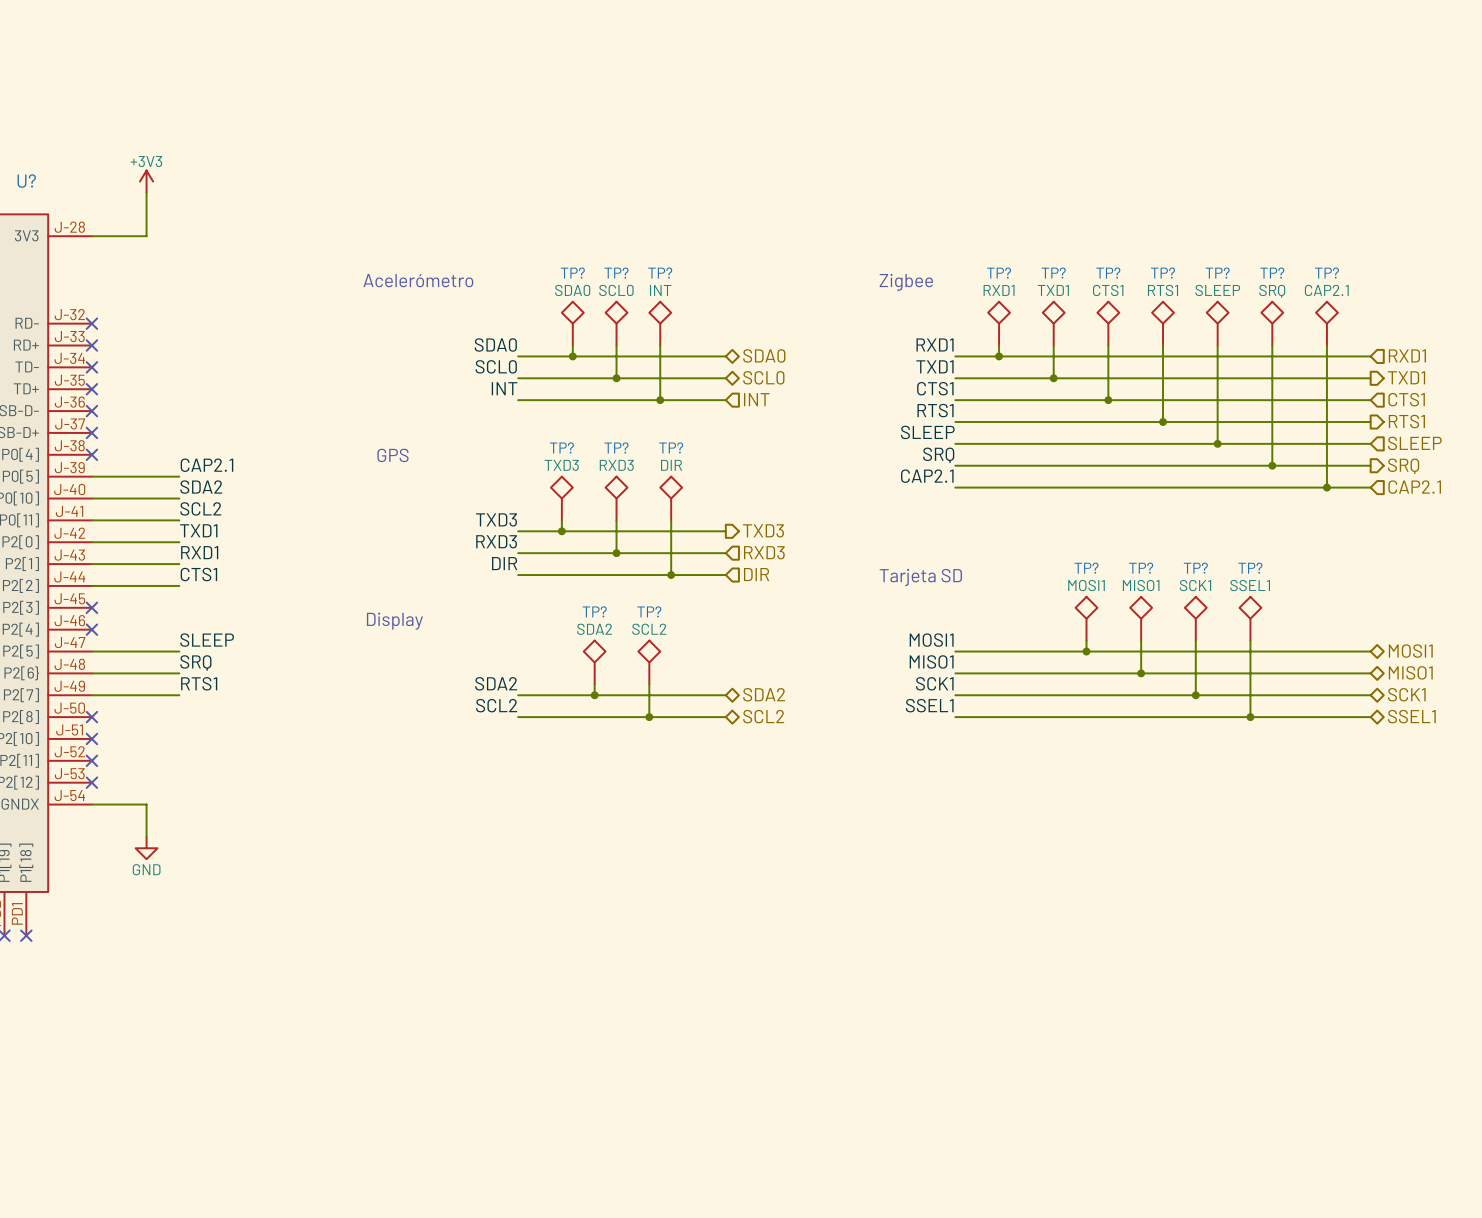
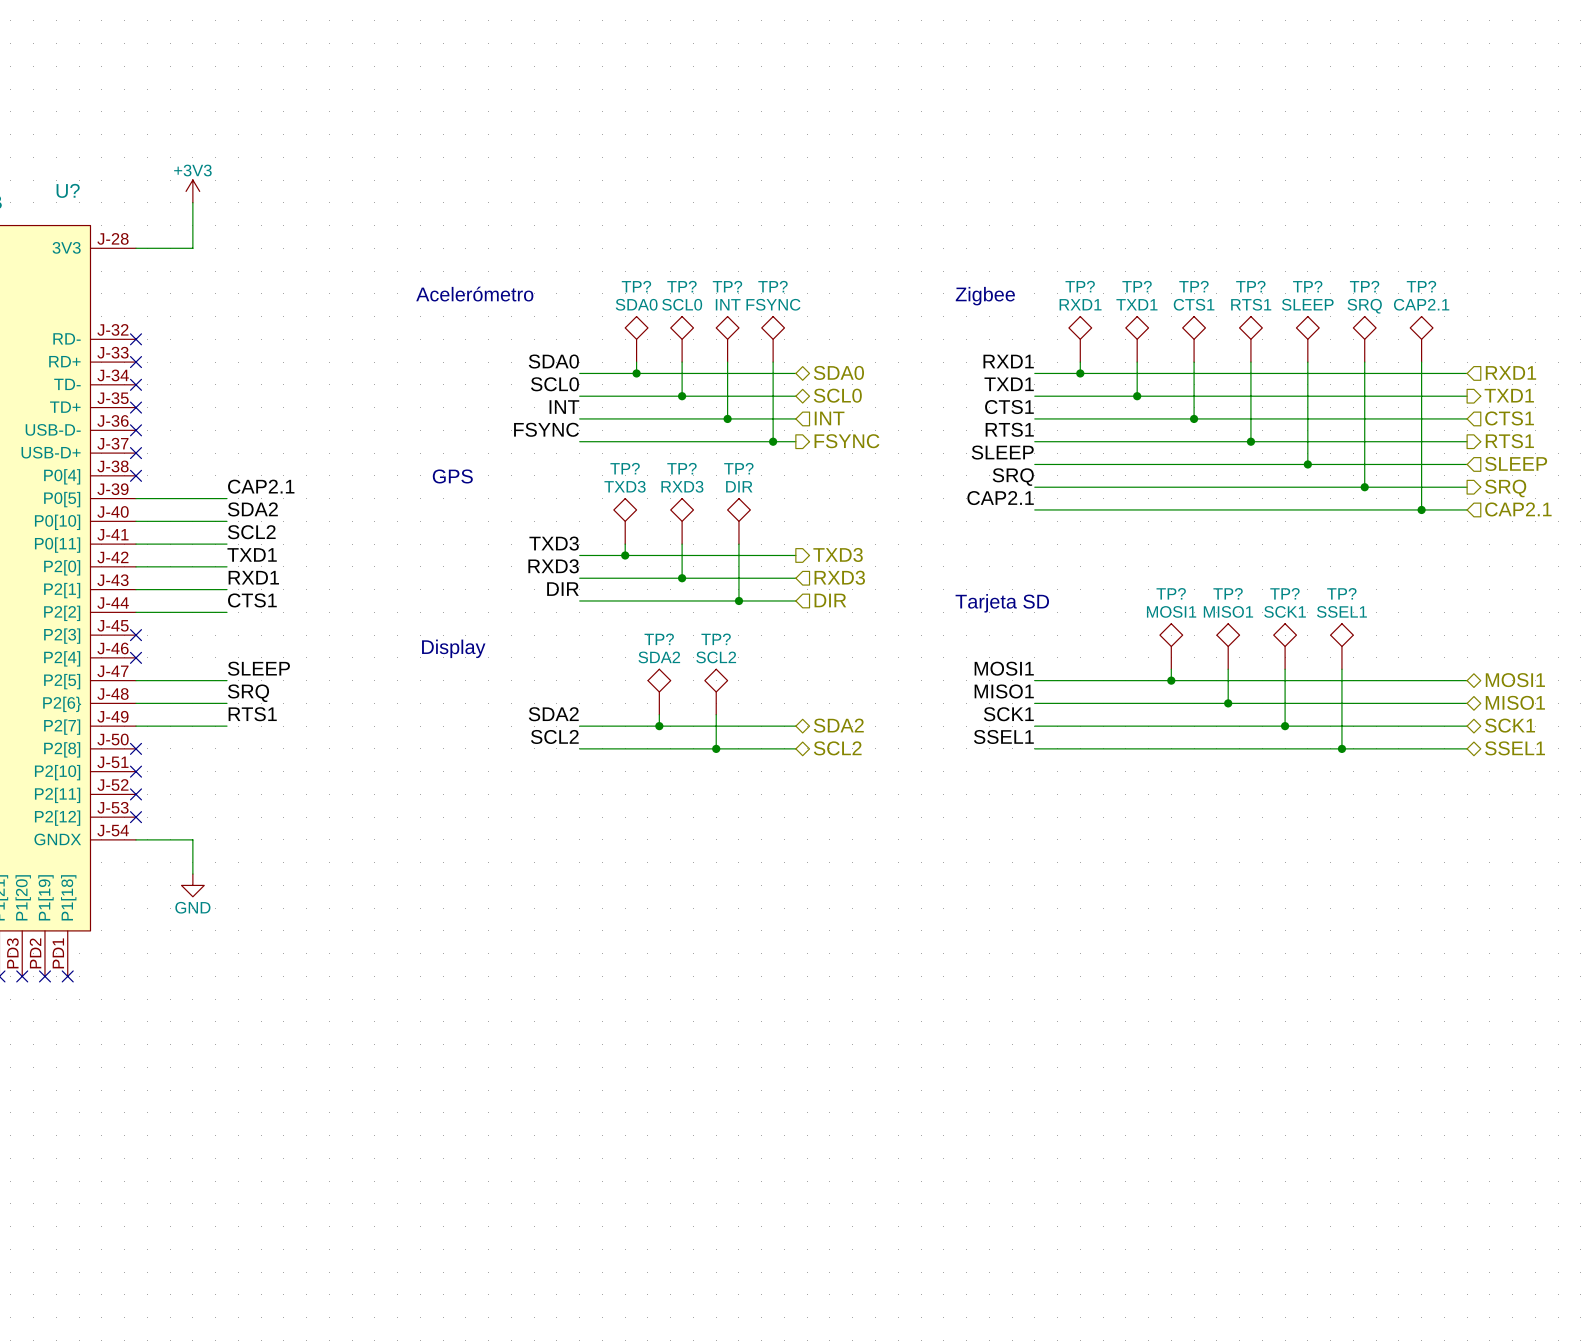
TP?: none -> FSYNC (773, 339)
wire: none -> (773, 362) (773, 441)
label: none -> FSYNC (546, 429)
hierarchical label: none -> FSYNC (846, 441)
wire: none -> (579, 441) (795, 441)
junction: none -> (773, 441)

